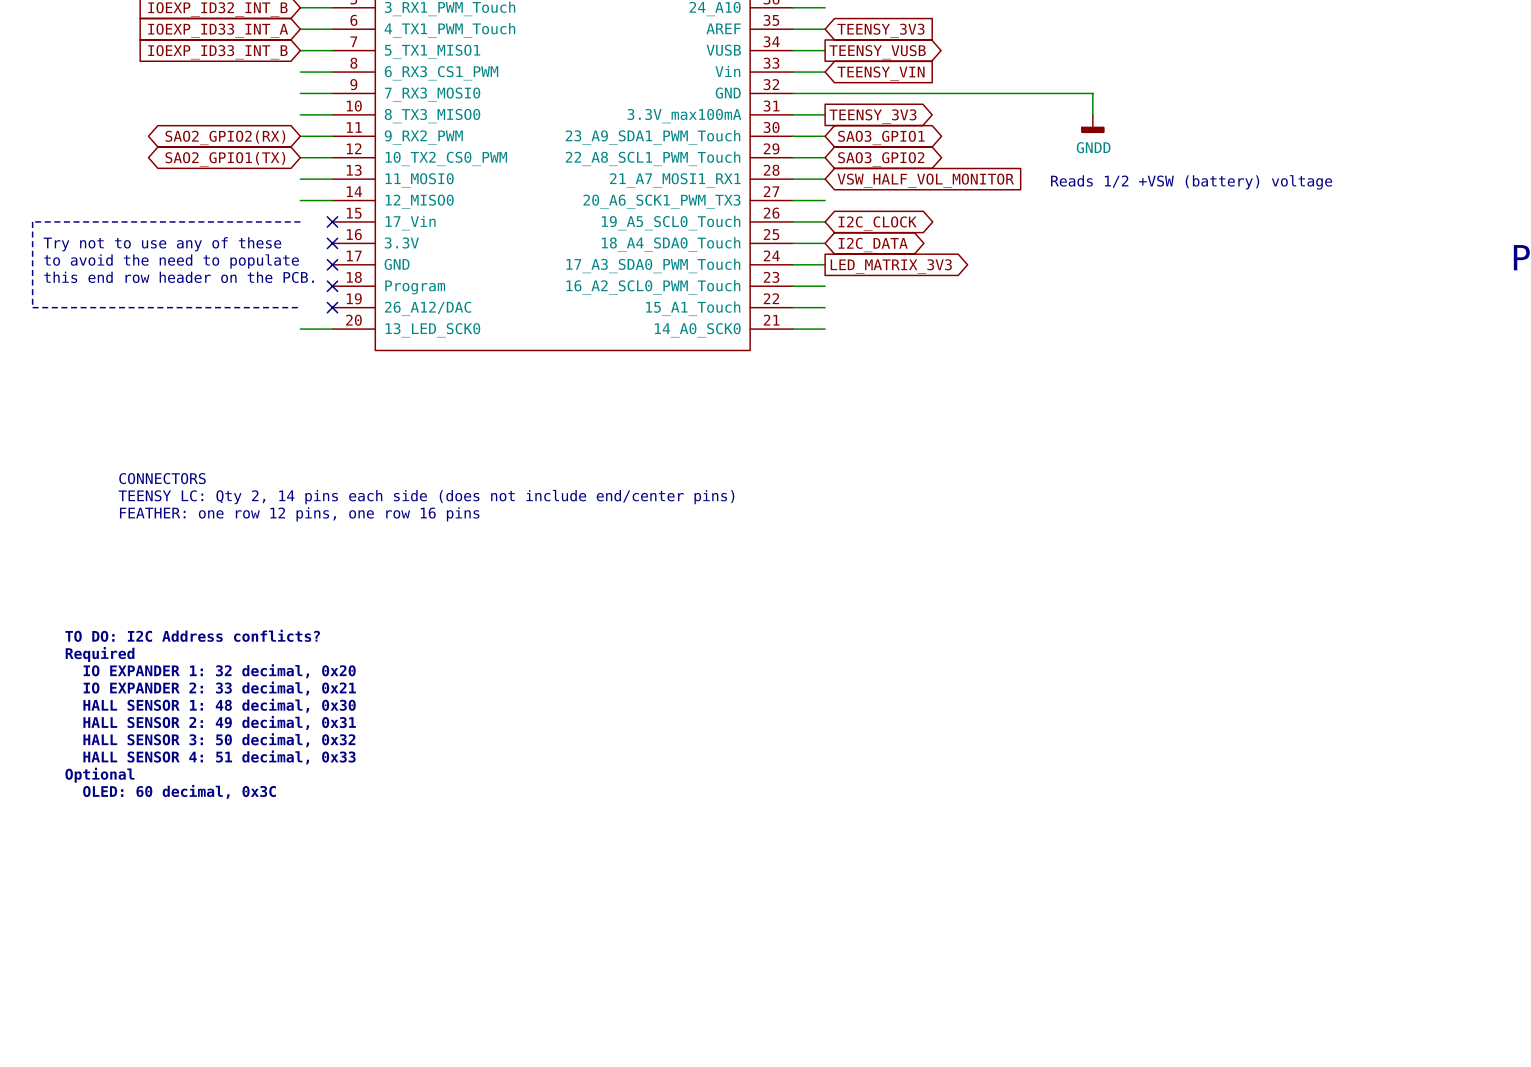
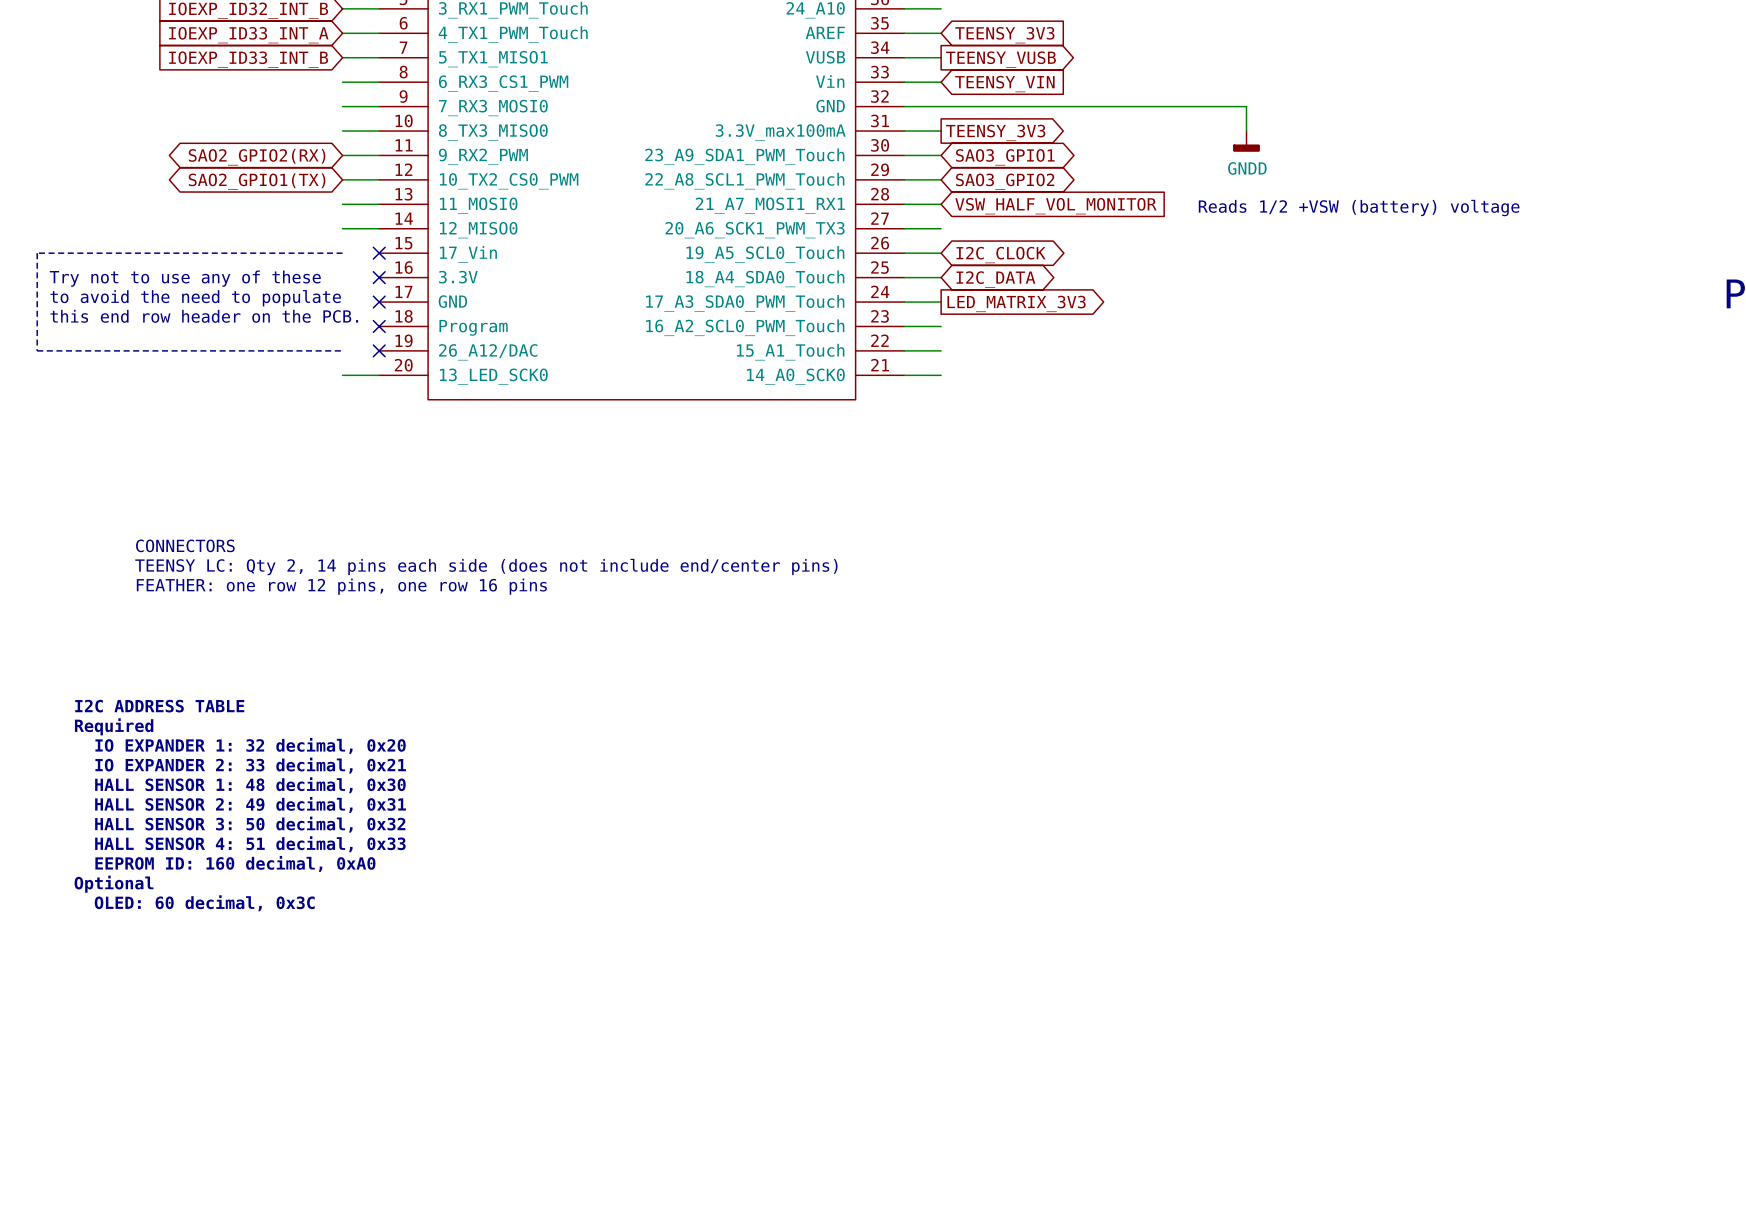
text: none -> I2C ADDRESS TABLE (159, 706)
text: TO DO: I2C Address conflicts? (192, 635) -> Required (114, 726)
text: Required (100, 654) -> IO EXPANDER 1: 32 decimal, 0x20 (250, 745)
text: IO EXPANDER 1: 32 decimal, 0x20 (219, 671) -> IO EXPANDER 2: 33 decimal, 0x21 (250, 765)
text: IO EXPANDER 2: 33 decimal, 0x21 (219, 688) -> HALL SENSOR 1: 48 decimal, 0x30 (250, 785)
text: HALL SENSOR 1: 48 decimal, 0x30 (219, 705) -> HALL SENSOR 2: 49 decimal, 0x31 (250, 804)
text: HALL SENSOR 2: 49 decimal, 0x31 (219, 722) -> HALL SENSOR 3: 50 decimal, 0x32 (250, 824)
text: HALL SENSOR 3: 50 decimal, 0x32 (219, 740) -> HALL SENSOR 4: 51 decimal, 0x33 (250, 844)
text: HALL SENSOR 4: 51 decimal, 0x33 (219, 757) -> EEPROM ID: 160 decimal, 0xA0 (235, 863)

